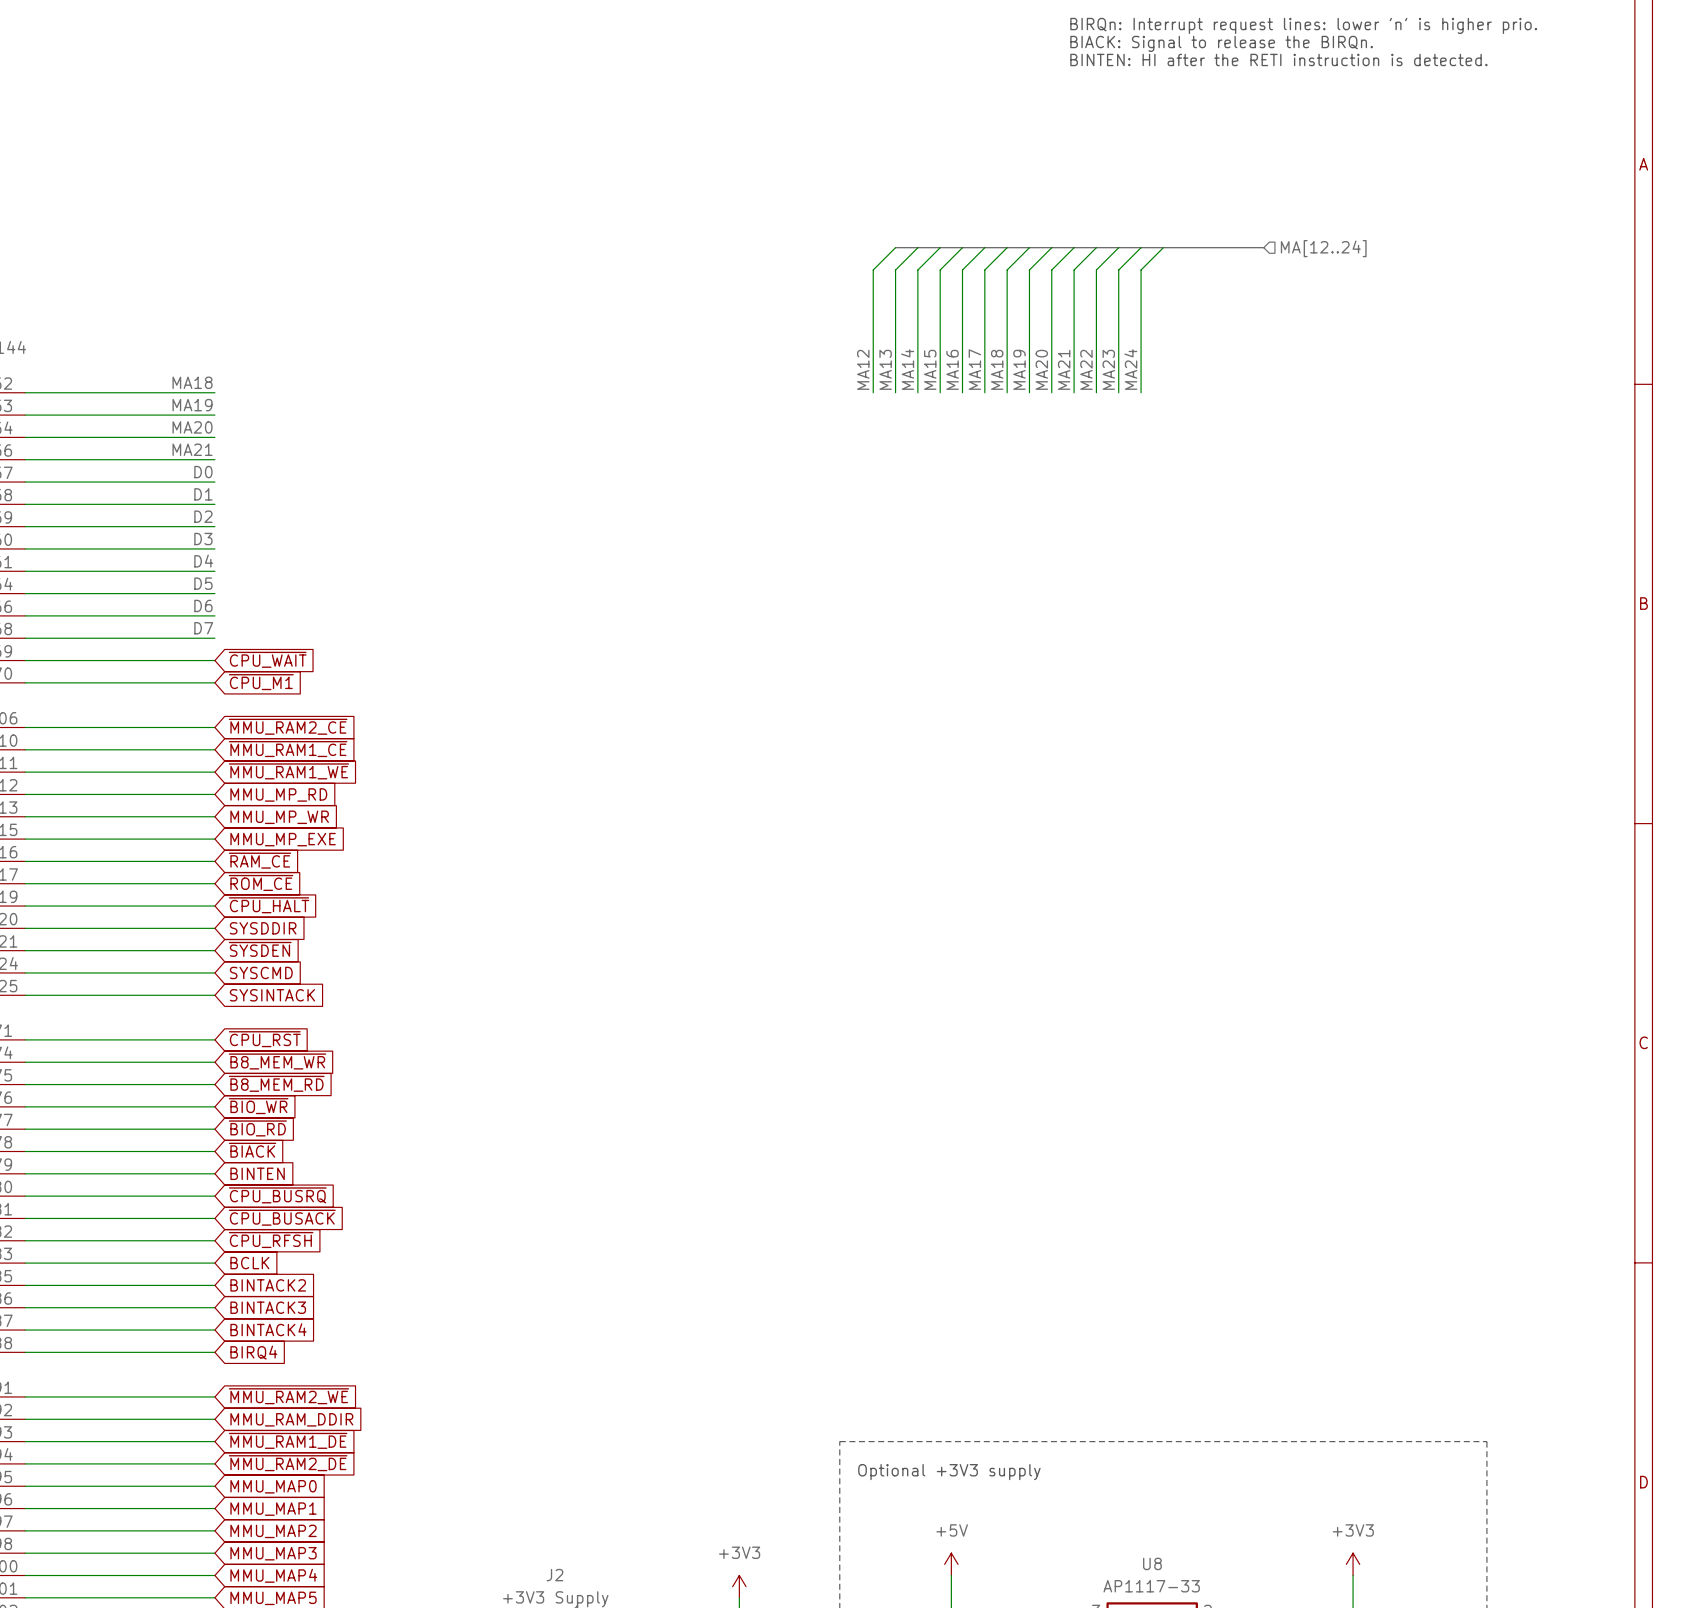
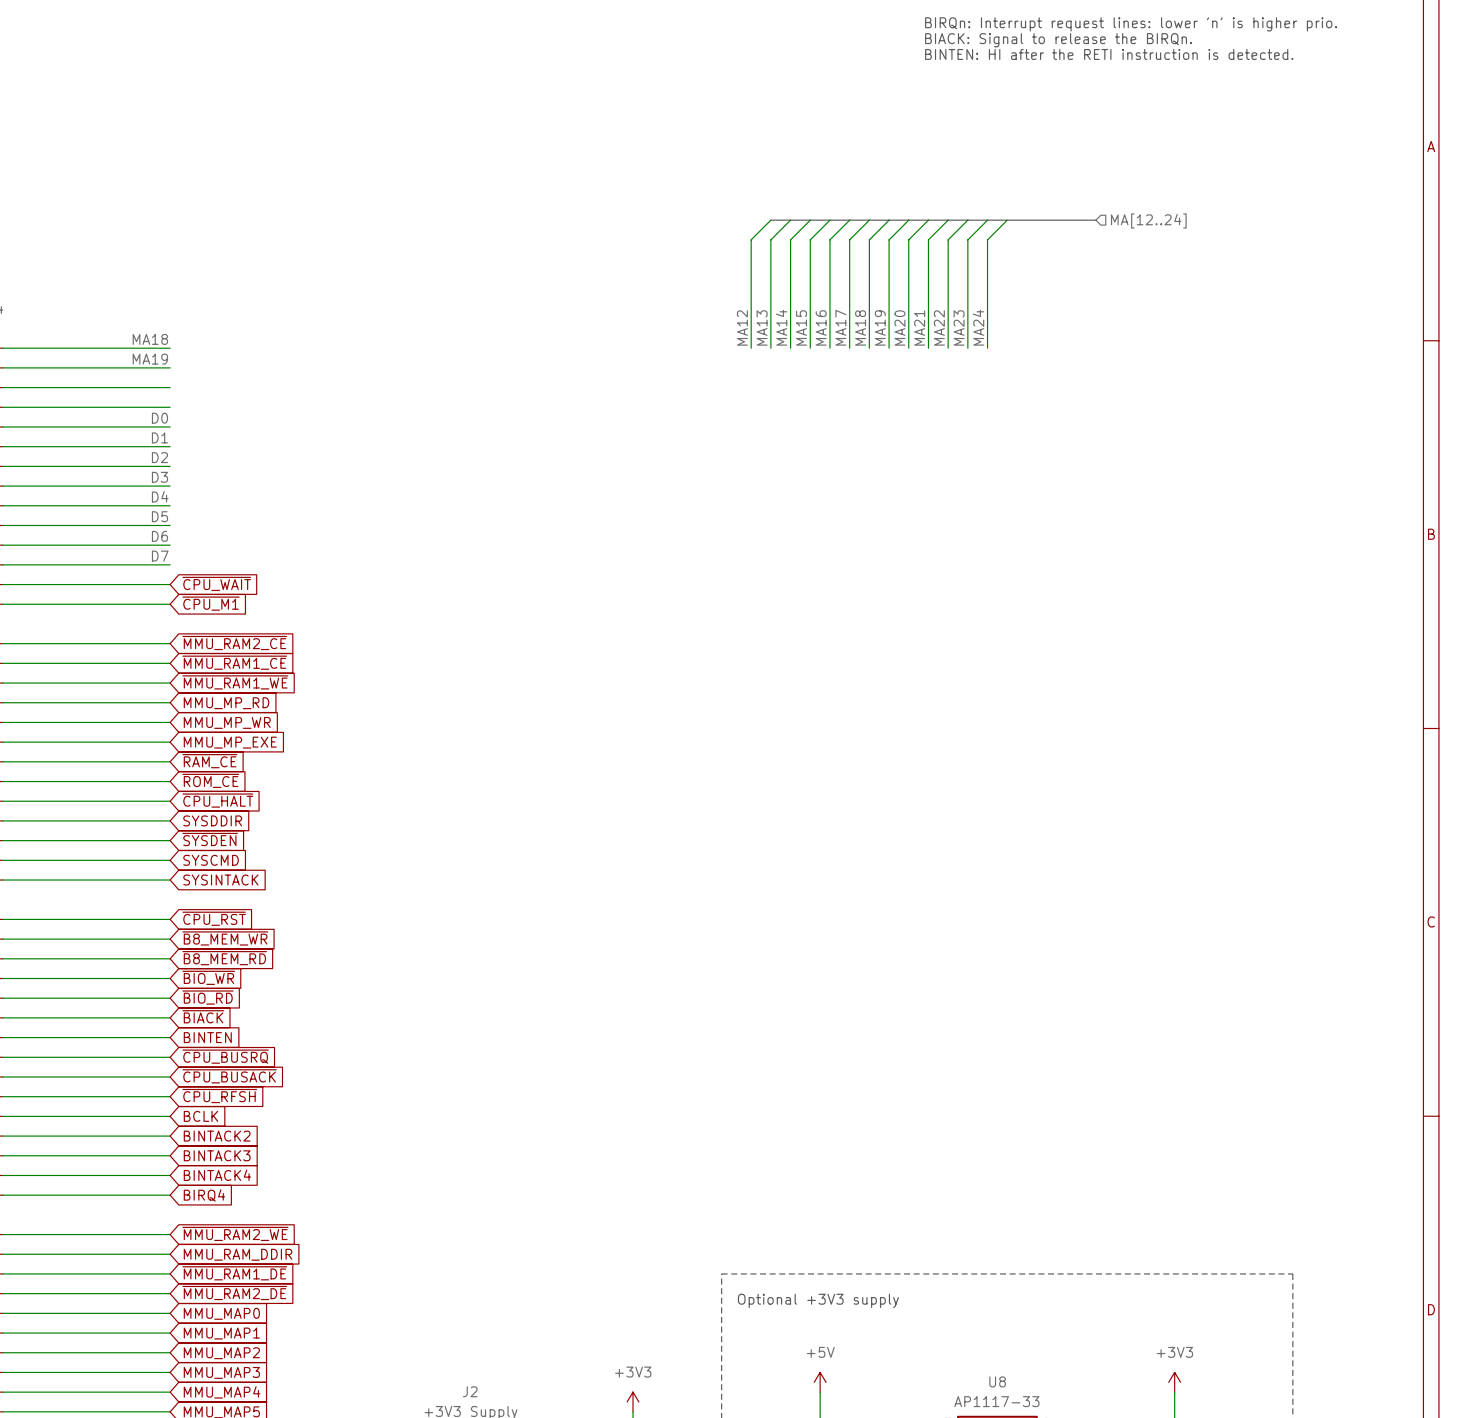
label: MA20 (192, 427) -> none
label: MA21 (192, 449) -> none

